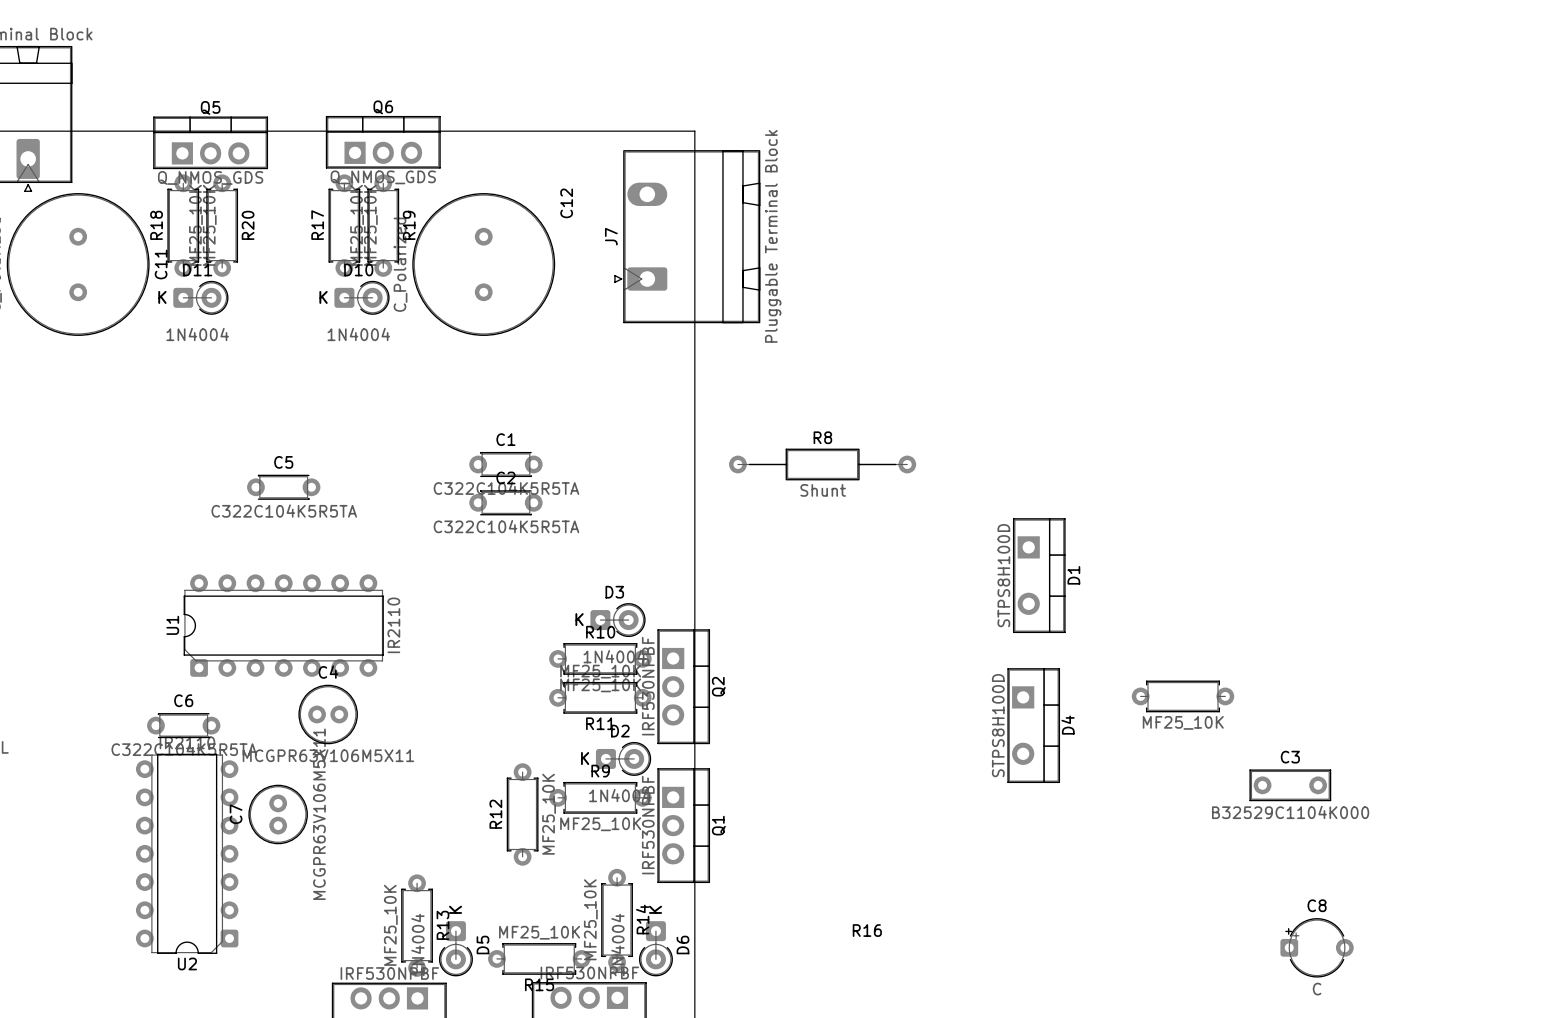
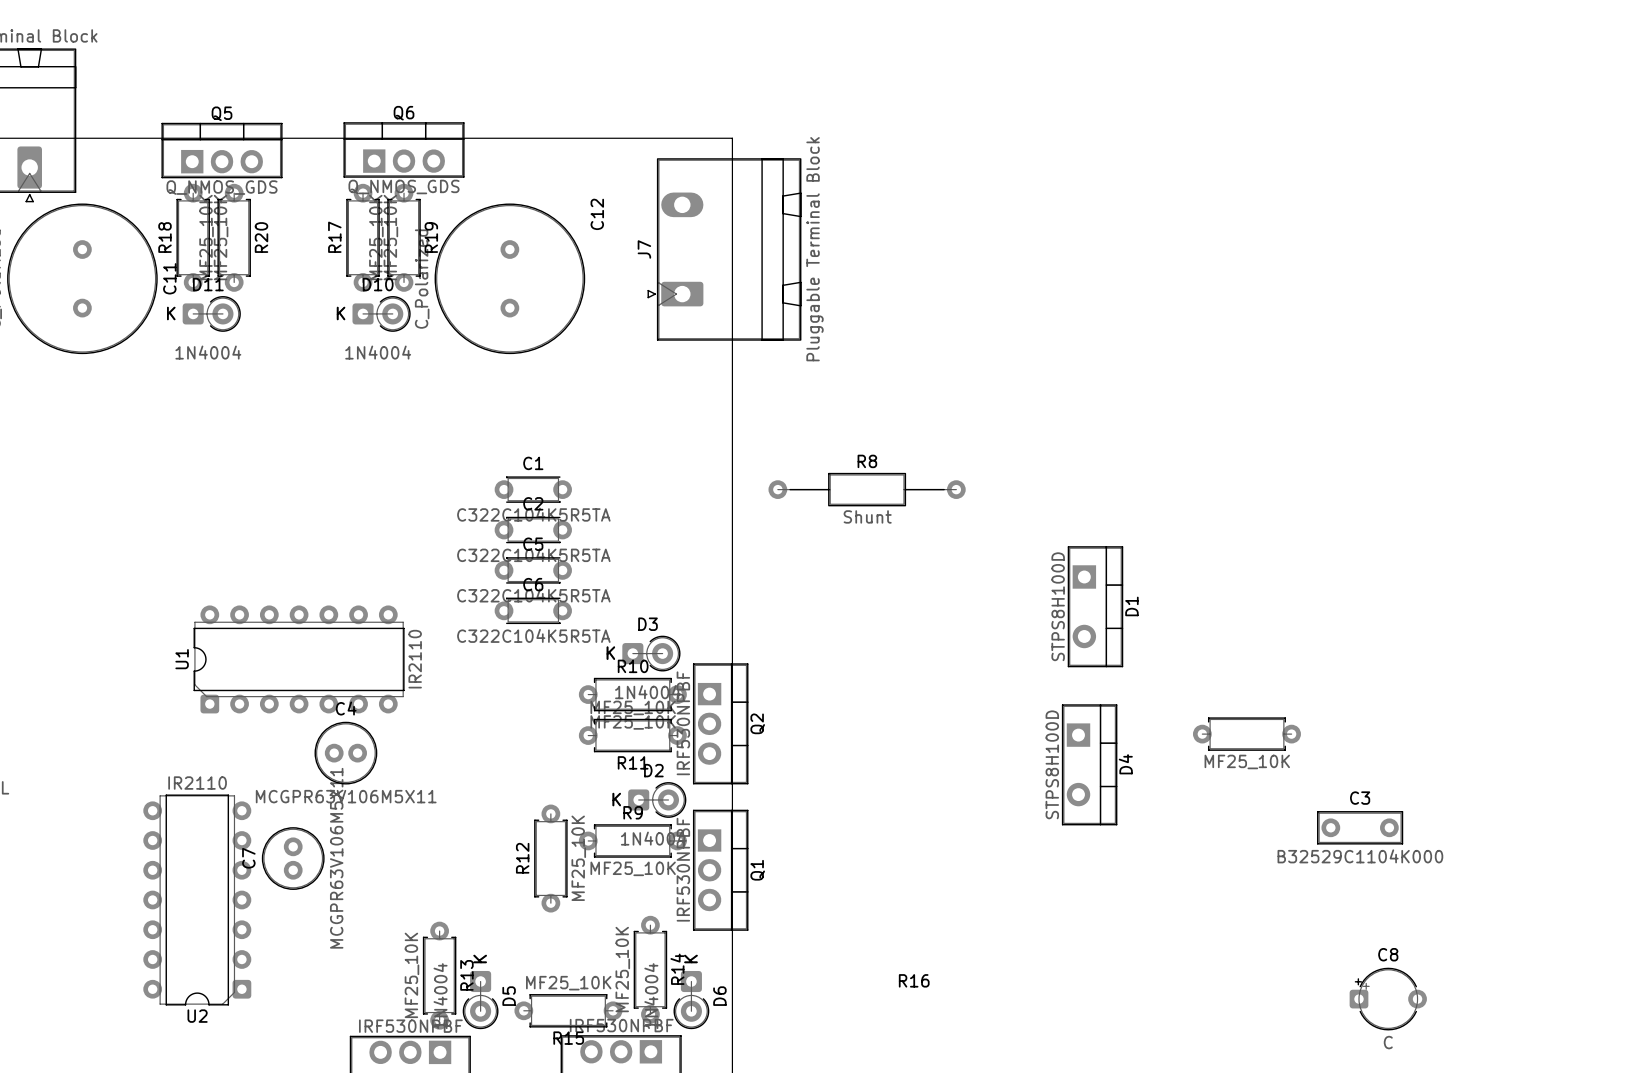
C5 position: (283, 487) -> (533, 570)
C6 position: (183, 725) -> (533, 610)

